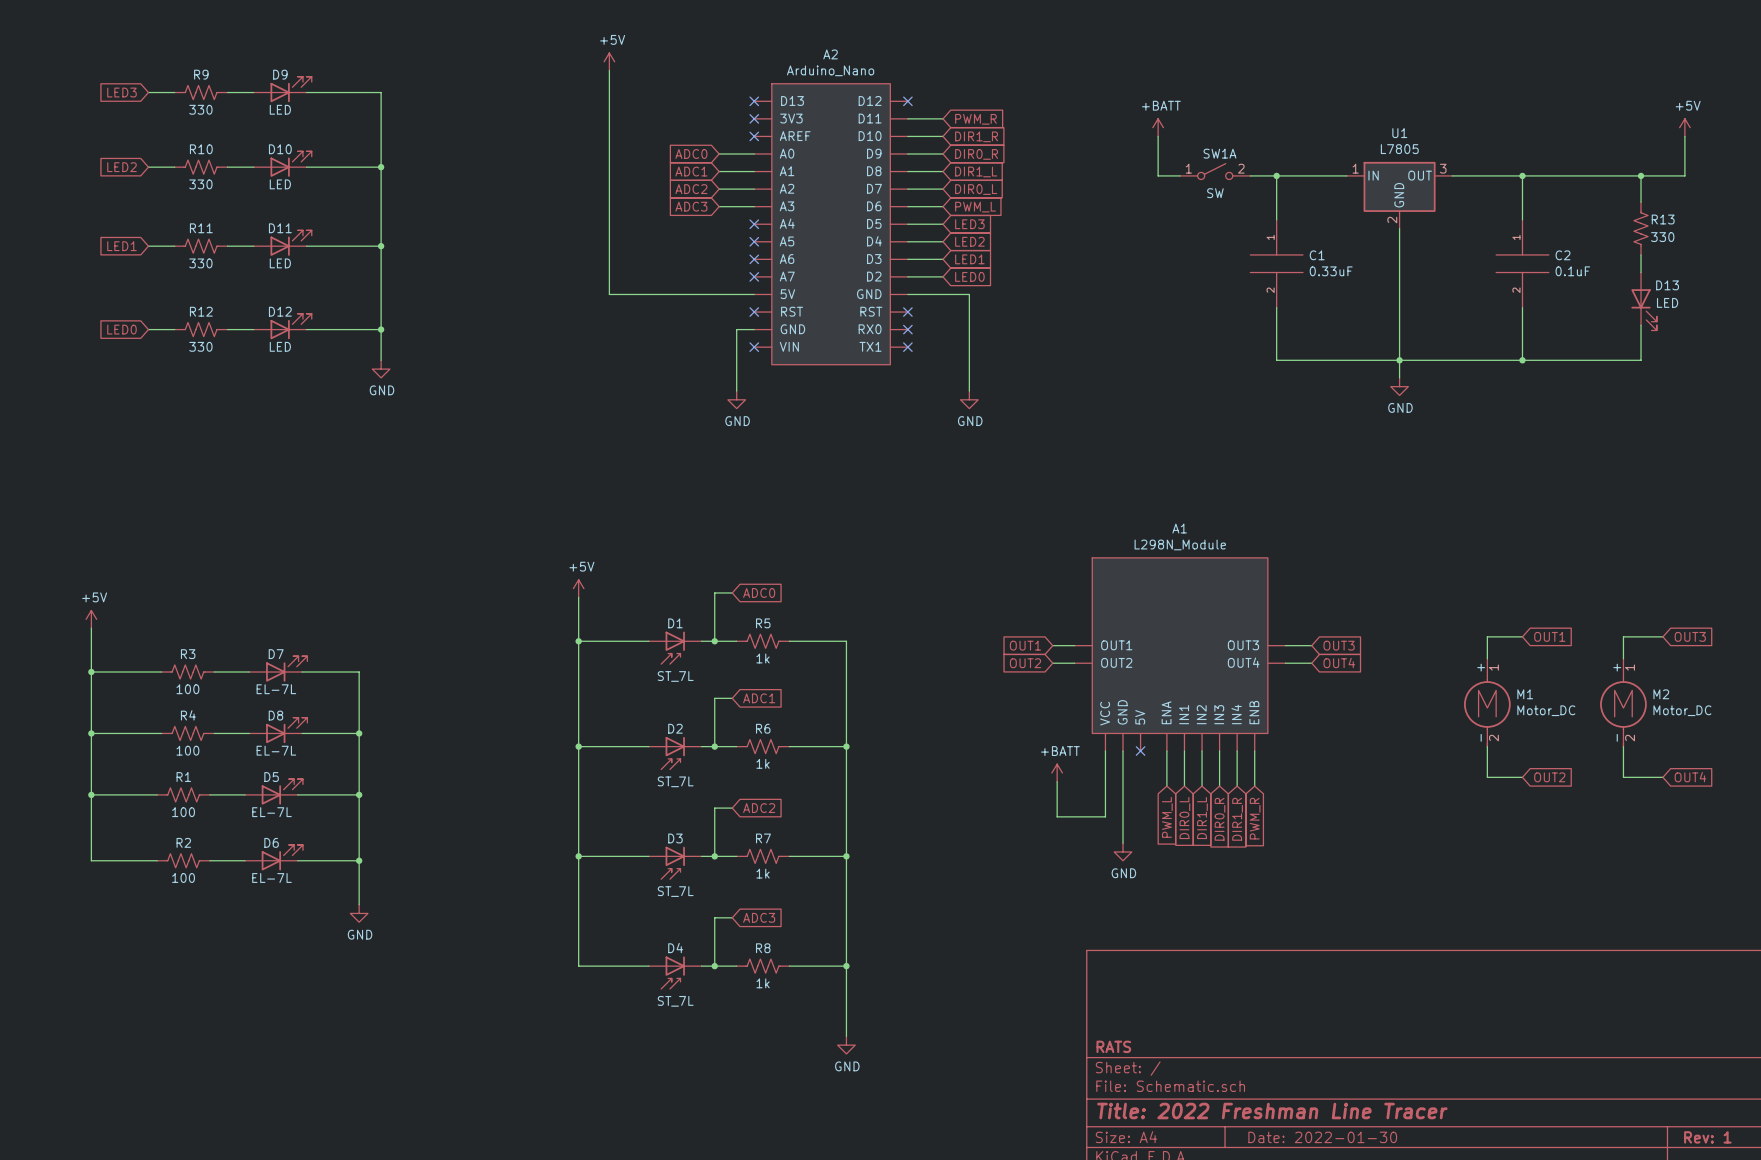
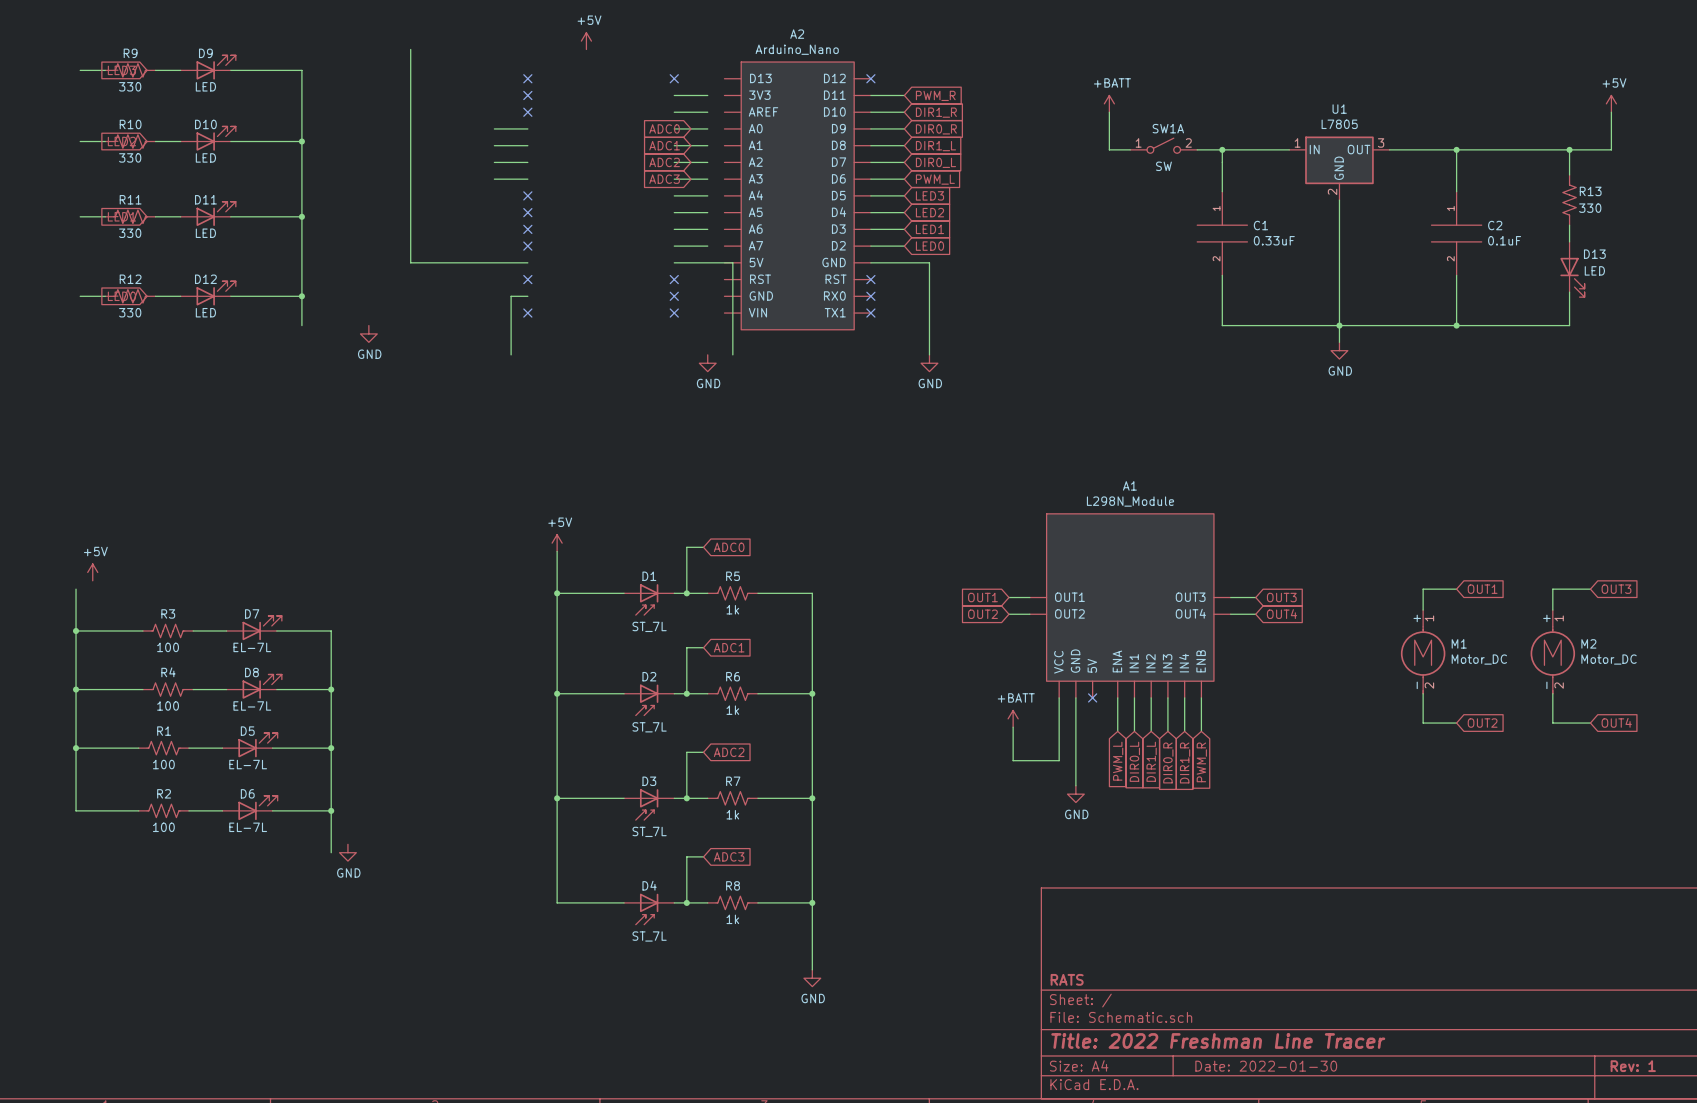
wire: none -> (410, 49) (410, 262) (527, 262)
wire: (609, 70) (609, 294) (701, 294) -> none
D9 position: (282, 89) -> (208, 67)
wire: none -> (80, 70) (105, 70)
R9 position: (201, 92) -> (130, 70)
wire: (310, 92) (381, 92) (381, 360) -> (301, 70) (301, 325)
no-connect mark: none -> (527, 78)
no-connect mark: none -> (674, 78)
no-connect mark: (754, 101) -> none
no-connect mark: none -> (527, 95)
wire: none -> (674, 95) (707, 95)
no-connect mark: (754, 118) -> none
no-connect mark: none -> (527, 112)
wire: none -> (674, 112) (707, 112)
no-connect mark: (754, 136) -> none
wire: none -> (494, 128) (527, 128)
wire: (736, 153) (754, 153) -> (674, 128) (691, 128)
D10 position: (282, 164) -> (208, 138)
wire: none -> (80, 141) (105, 141)
R10 position: (201, 167) -> (130, 141)
wire: (310, 167) (381, 167) -> none
junction: none -> (301, 141)
junction: (381, 167) -> none
wire: none -> (494, 145) (527, 145)
wire: (736, 171) (754, 171) -> (674, 145) (691, 145)
wire: none -> (494, 162) (527, 162)
wire: (736, 189) (754, 189) -> (674, 162) (691, 162)
wire: none -> (494, 179) (527, 179)
wire: (736, 206) (754, 206) -> (674, 179) (691, 179)
no-connect mark: none -> (527, 195)
wire: none -> (674, 195) (707, 195)
no-connect mark: (754, 224) -> none
no-connect mark: none -> (527, 212)
wire: none -> (674, 212) (707, 212)
no-connect mark: (754, 241) -> none
D11 position: (282, 243) -> (208, 213)
wire: none -> (80, 216) (105, 216)
R11 position: (201, 246) -> (130, 216)
wire: (310, 246) (381, 246) -> none
junction: none -> (301, 216)
junction: (381, 246) -> none
no-connect mark: none -> (527, 229)
wire: none -> (674, 229) (707, 229)
no-connect mark: (754, 259) -> none
no-connect mark: none -> (527, 246)
wire: none -> (674, 246) (707, 246)
no-connect mark: (754, 276) -> none
wire: none -> (724, 262) (732, 262) (732, 354)
no-connect mark: none -> (527, 279)
no-connect mark: none -> (674, 279)
no-connect mark: (754, 312) -> none
D12 position: (282, 326) -> (208, 293)
wire: none -> (80, 296) (105, 296)
R12 position: (201, 329) -> (130, 296)
wire: (310, 329) (381, 329) -> none
junction: none -> (301, 296)
junction: (381, 329) -> none
wire: none -> (527, 296) (511, 296) (511, 354)
no-connect mark: none -> (674, 296)
wire: (754, 329) (736, 329) (736, 391) -> none
no-connect mark: none -> (527, 313)
no-connect mark: none -> (674, 313)
no-connect mark: (754, 347) -> none
wire: (91, 628) (91, 860) (157, 860) -> (76, 589) (76, 810) (138, 810)
D7 position: (278, 668) -> (254, 628)
wire: (91, 672) (161, 672) -> (76, 630) (142, 630)
junction position: (91, 672) -> (76, 630)
R3 position: (187, 672) -> (168, 630)
wire: (214, 672) (249, 672) -> (193, 630) (226, 630)
wire: (302, 672) (359, 672) (359, 904) -> (276, 630) (331, 630) (331, 852)
D8 position: (278, 730) -> (254, 686)
wire: (91, 733) (161, 733) -> (76, 689) (142, 689)
junction position: (91, 733) -> (76, 689)
R4 position: (187, 733) -> (168, 689)
wire: (214, 733) (249, 733) -> (193, 689) (226, 689)
wire: (302, 733) (359, 733) -> (276, 689) (331, 689)
junction position: (359, 733) -> (331, 689)
D5 position: (273, 791) -> (250, 745)
wire: (91, 794) (157, 794) -> (76, 748) (138, 748)
junction position: (91, 794) -> (76, 748)
R1 position: (183, 794) -> (163, 748)
wire: (209, 794) (245, 794) -> (188, 748) (222, 748)
wire: (297, 794) (359, 794) -> (272, 748) (331, 748)
junction position: (359, 794) -> (331, 748)
D6 position: (273, 857) -> (250, 807)
R2 position: (183, 860) -> (163, 810)
wire: (209, 860) (245, 860) -> (188, 810) (222, 810)
wire: (297, 860) (359, 860) -> (272, 810) (331, 810)
junction position: (359, 860) -> (331, 810)

